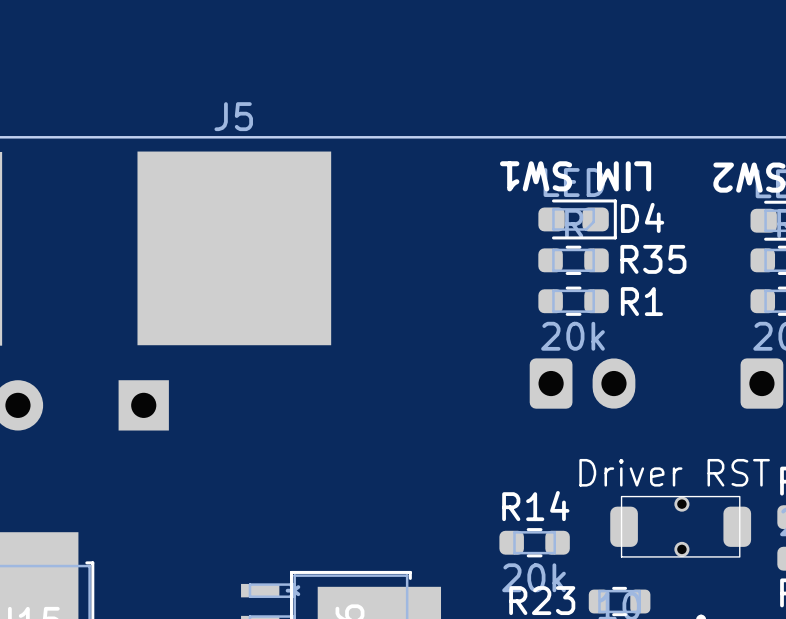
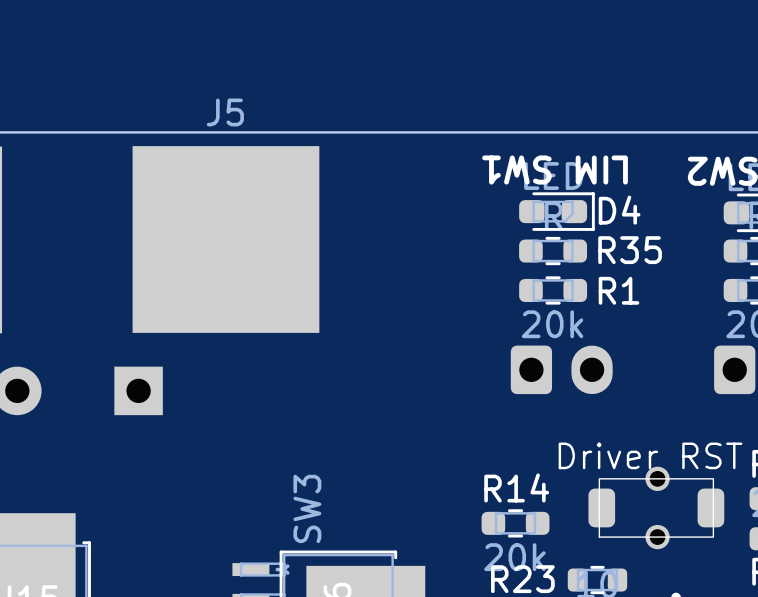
part: (680, 526) -> none
SW3: none -> (656, 507)

